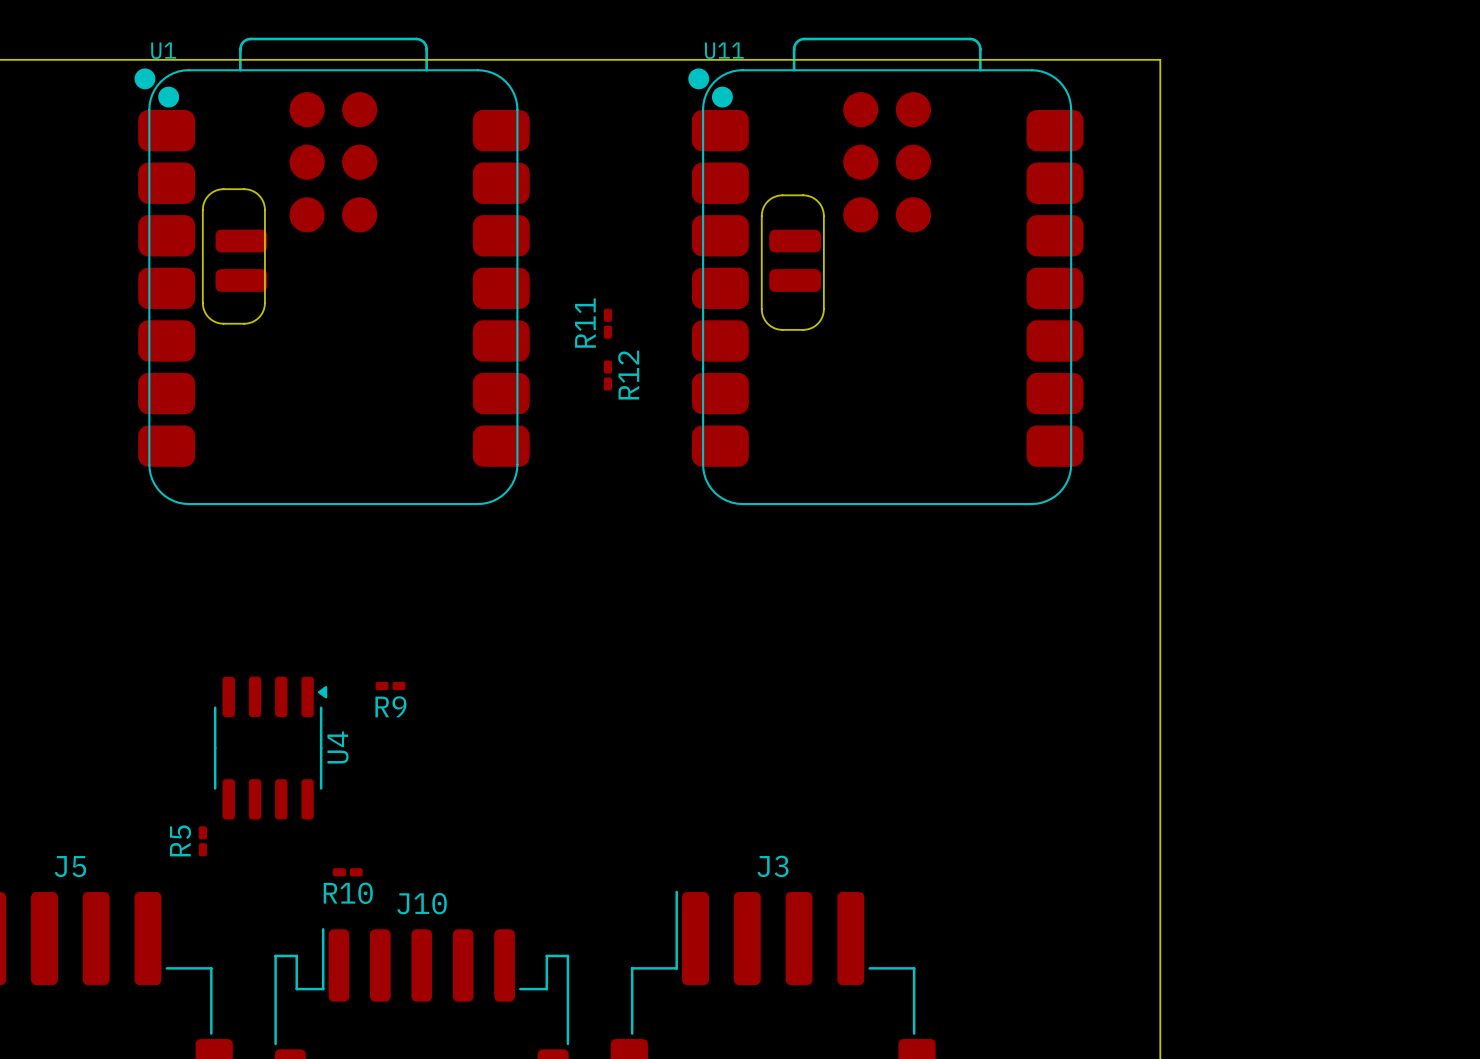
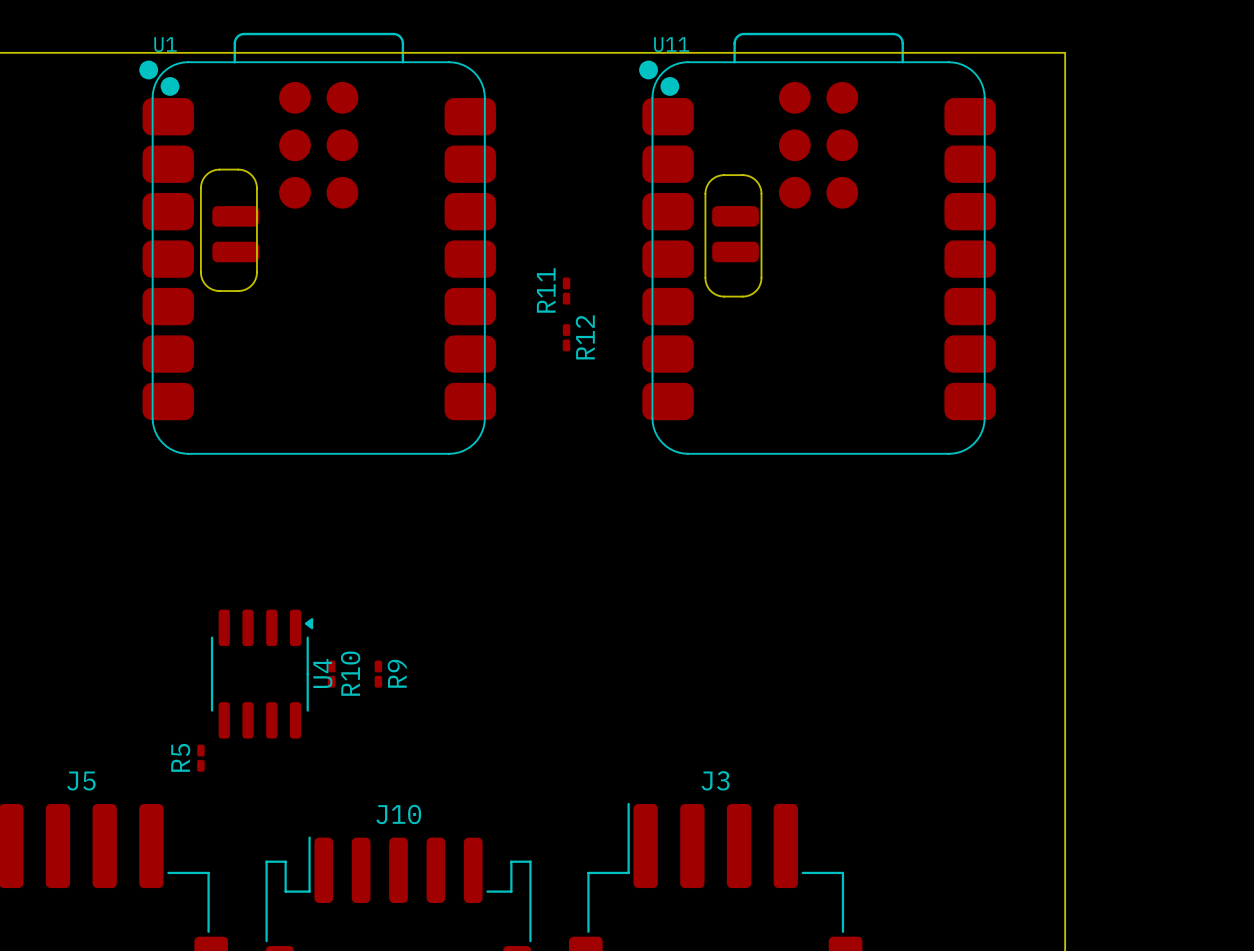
R9 rotation: 0° (390, 686) -> 90° clockwise (378, 674)
R9 position: (390, 686) -> (378, 674)
R10 rotation: 0° (347, 872) -> 90° clockwise (331, 674)
R10 position: (347, 872) -> (331, 674)

